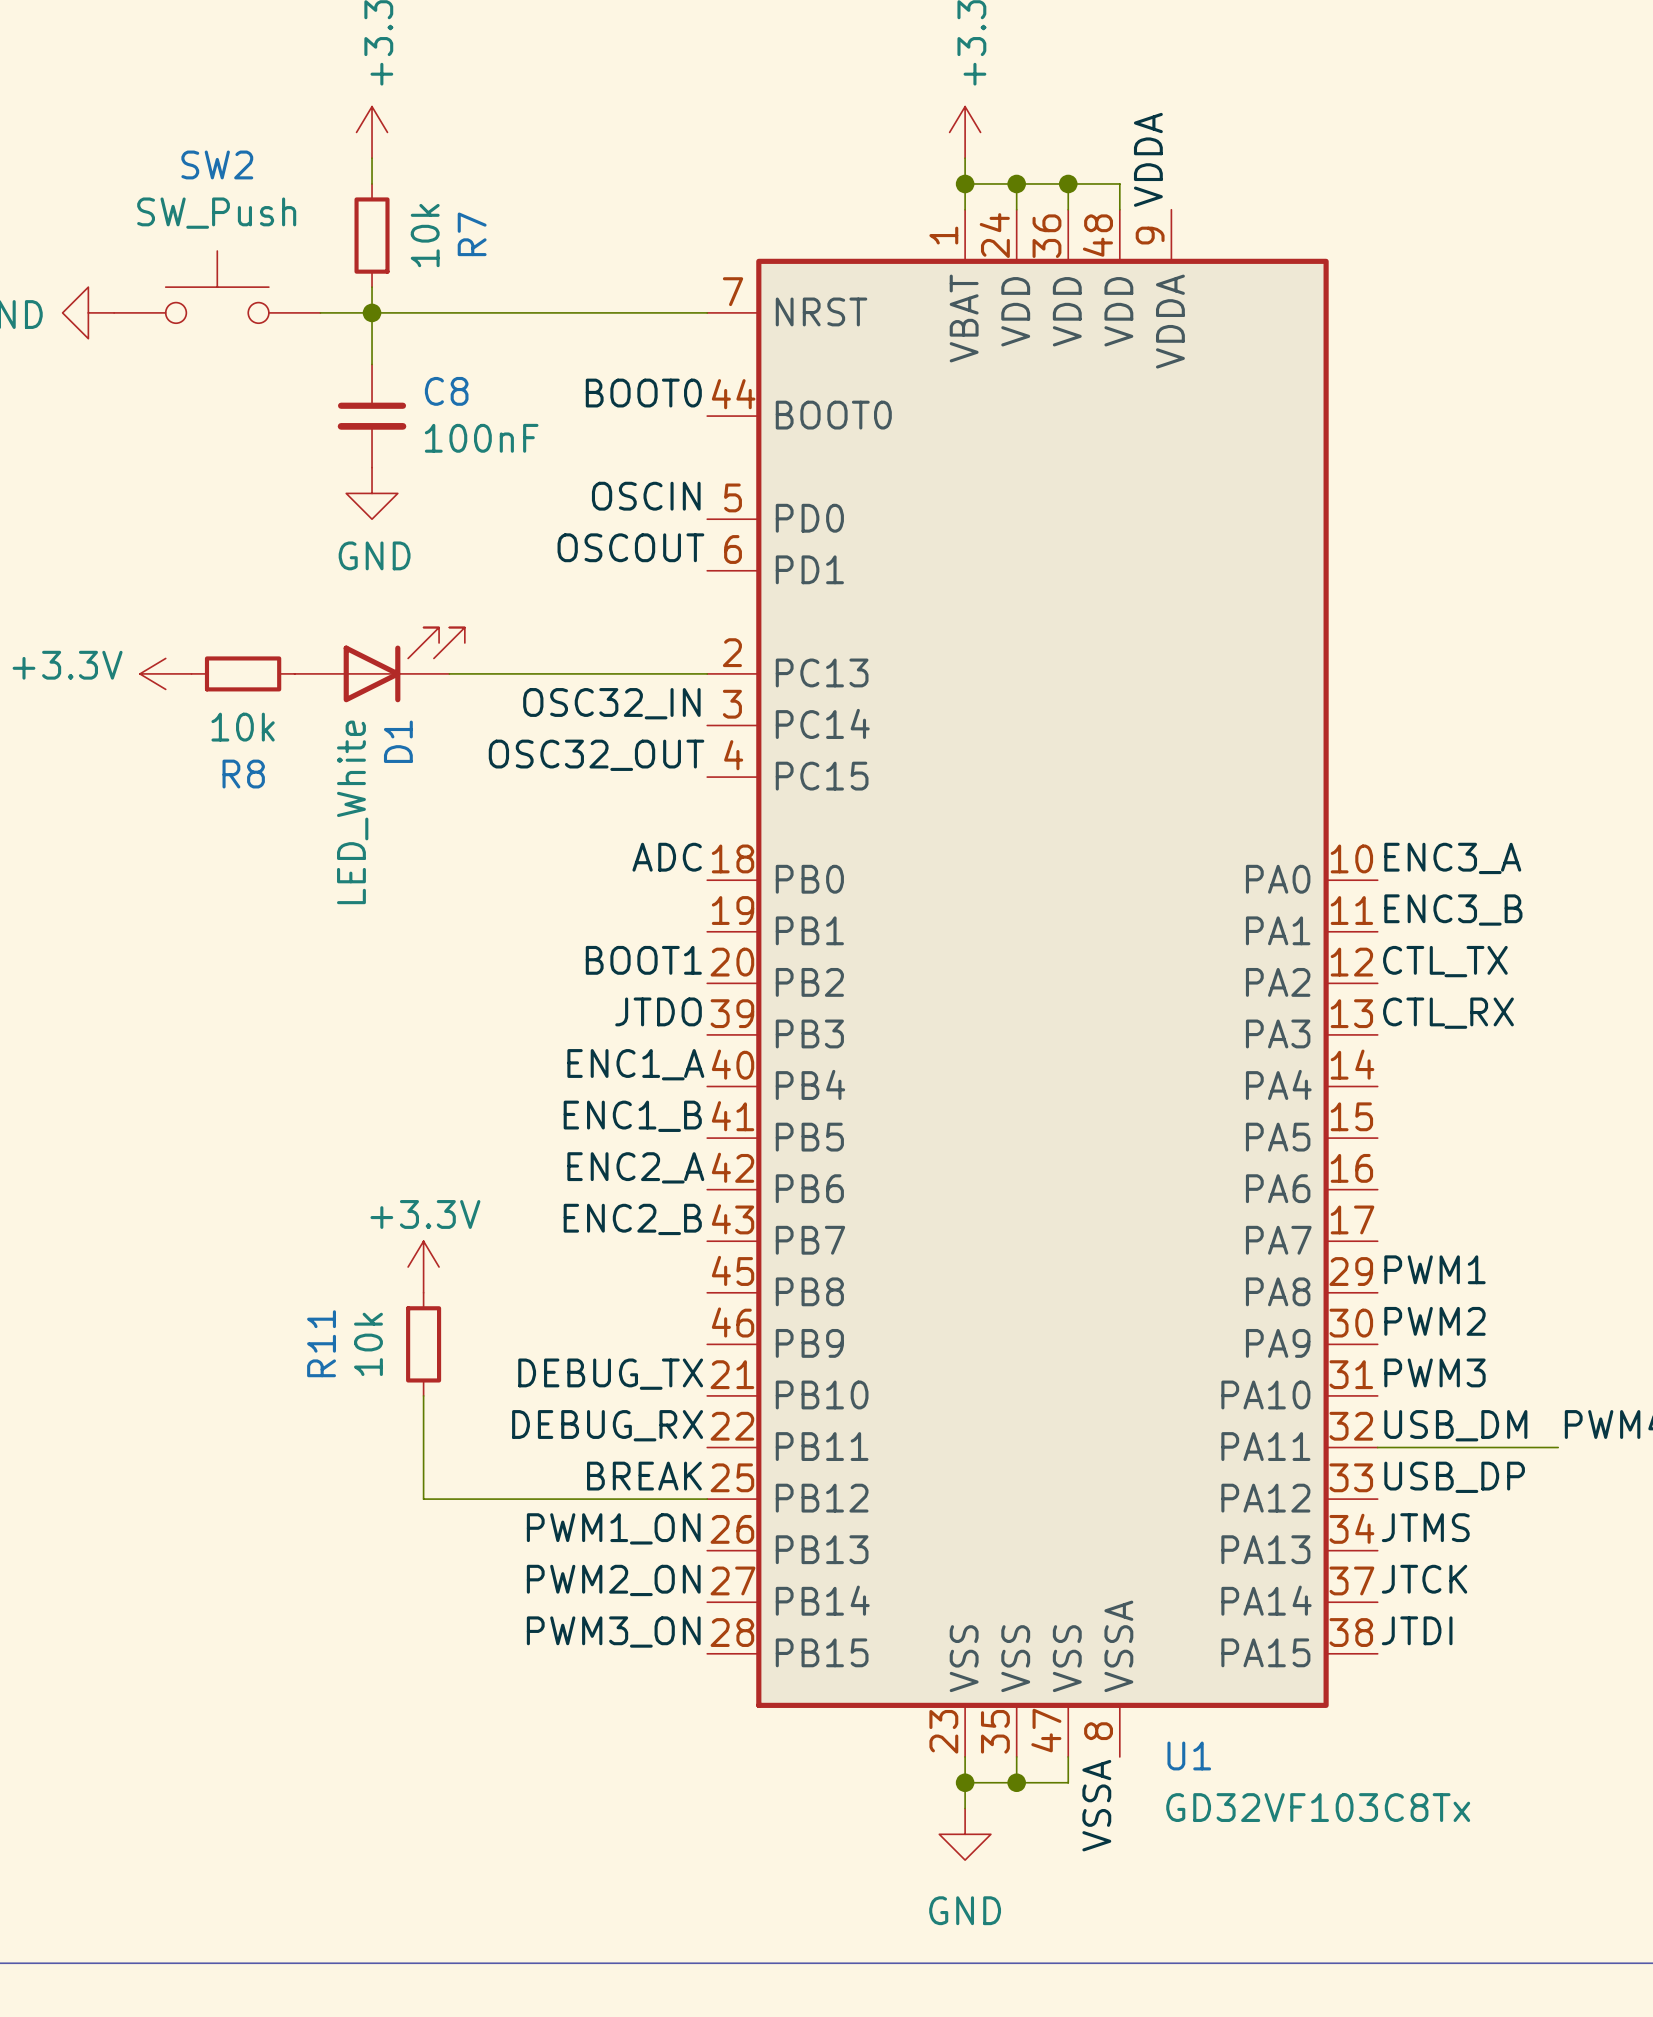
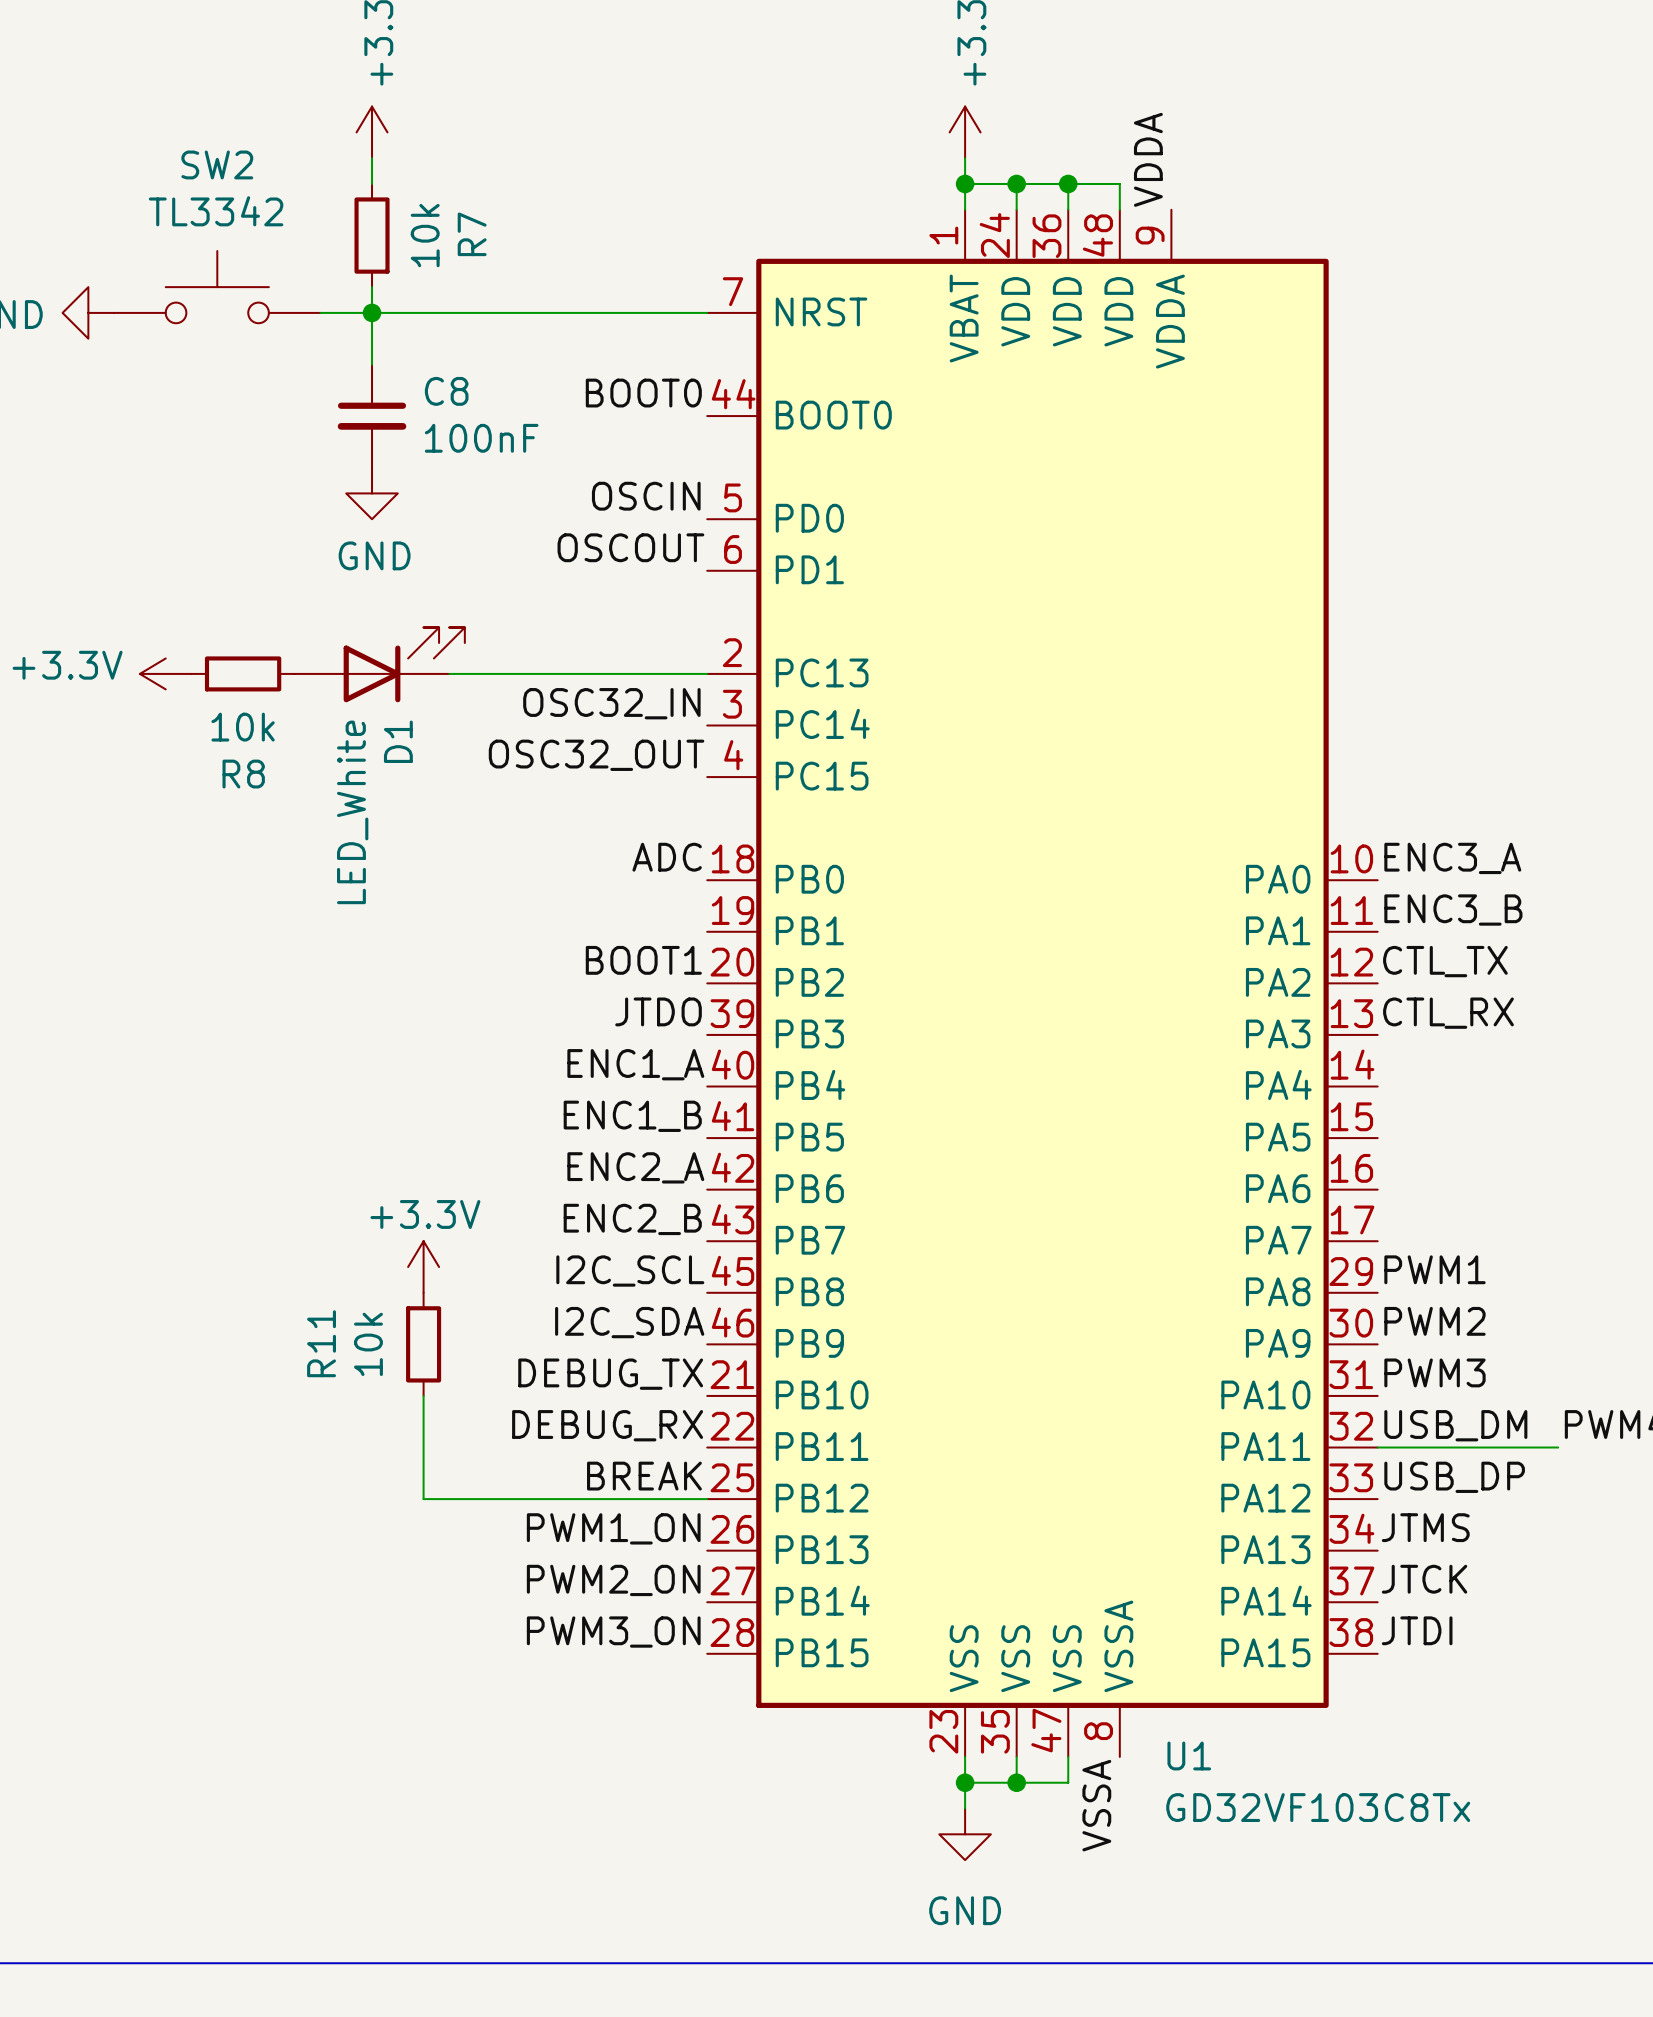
SW2 value: SW_Push (216, 213) -> TL3342 (216, 211)
label: none -> I2C_SCL (630, 1271)
label: none -> I2C_SDA (629, 1322)

